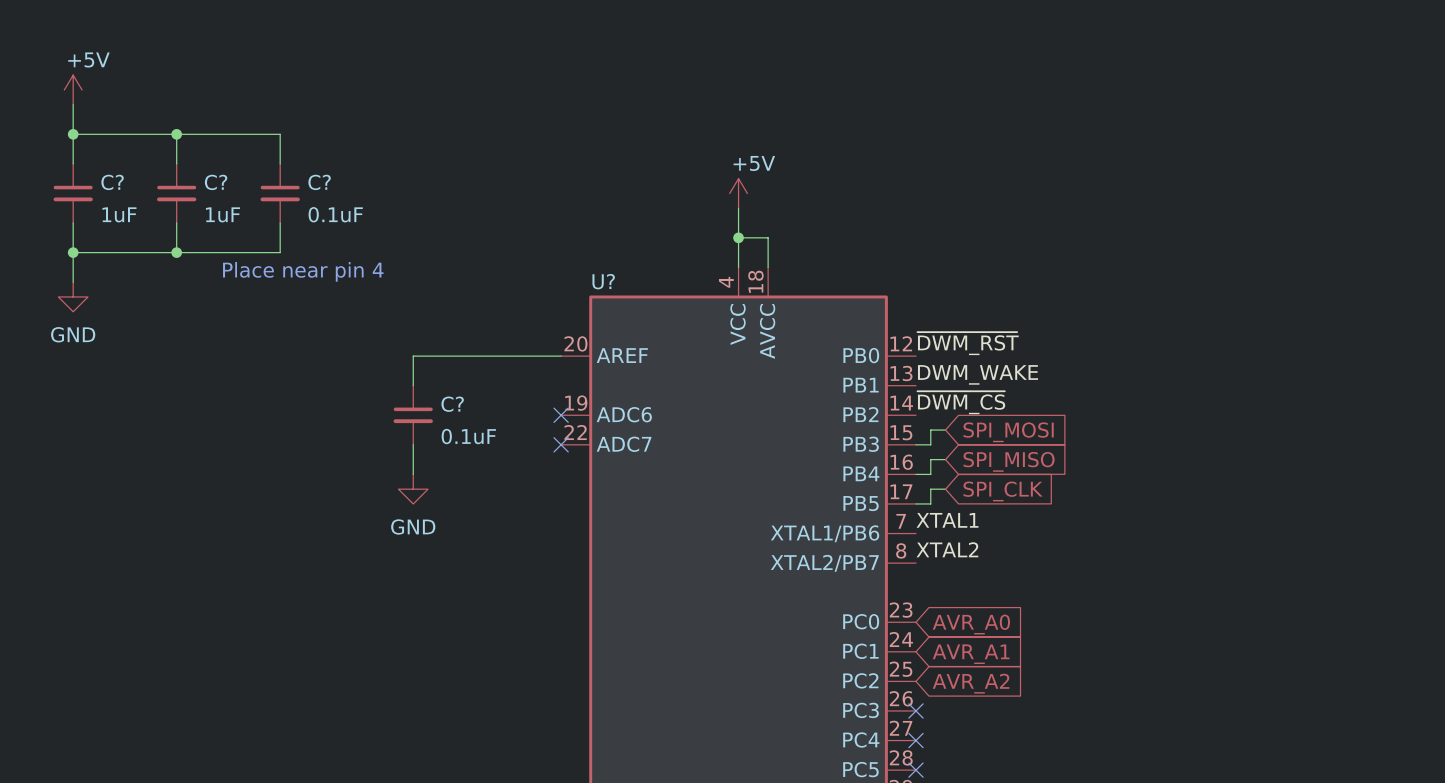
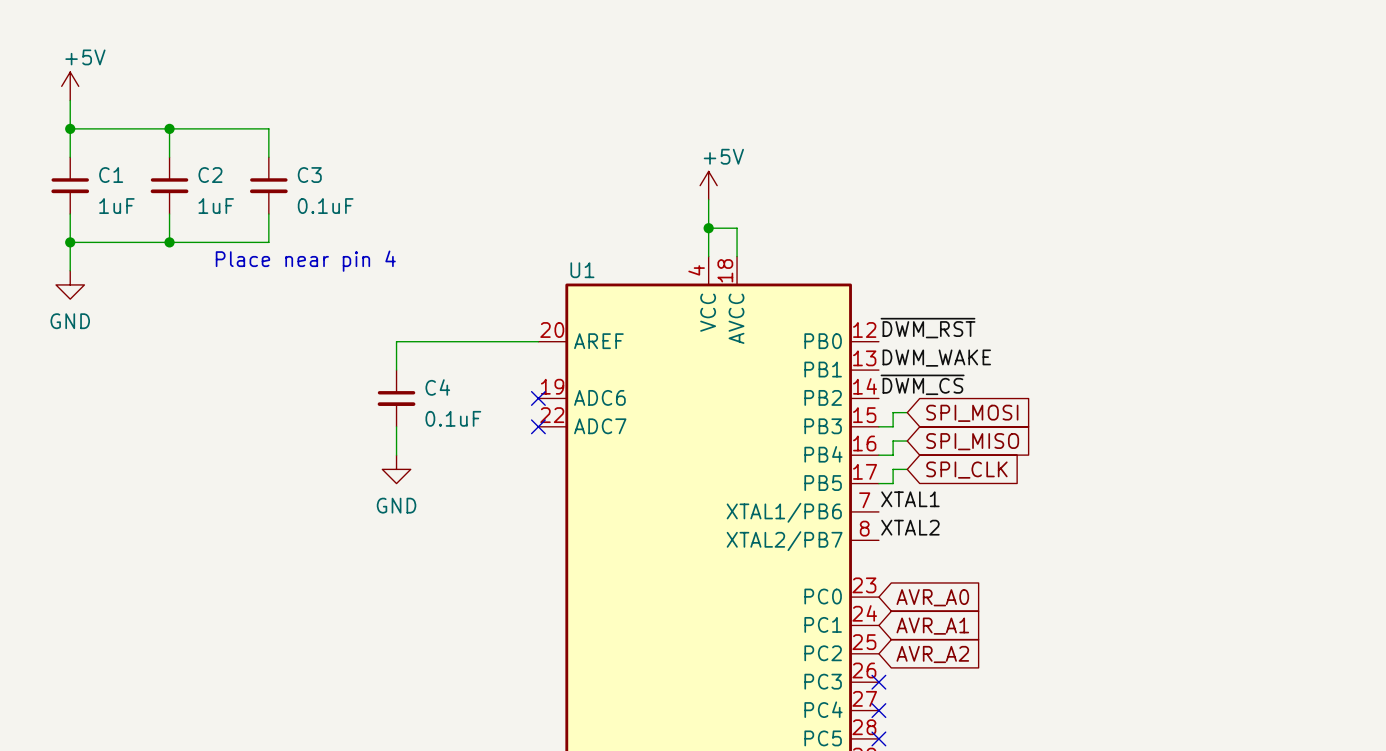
C? name: C? (112, 182) -> C1 (111, 175)
C? name: C? (216, 182) -> C2 (210, 175)
C? name: C? (319, 182) -> C3 (309, 175)
U? name: U? (603, 281) -> U1 (582, 270)
C? name: C? (452, 404) -> C4 (437, 387)

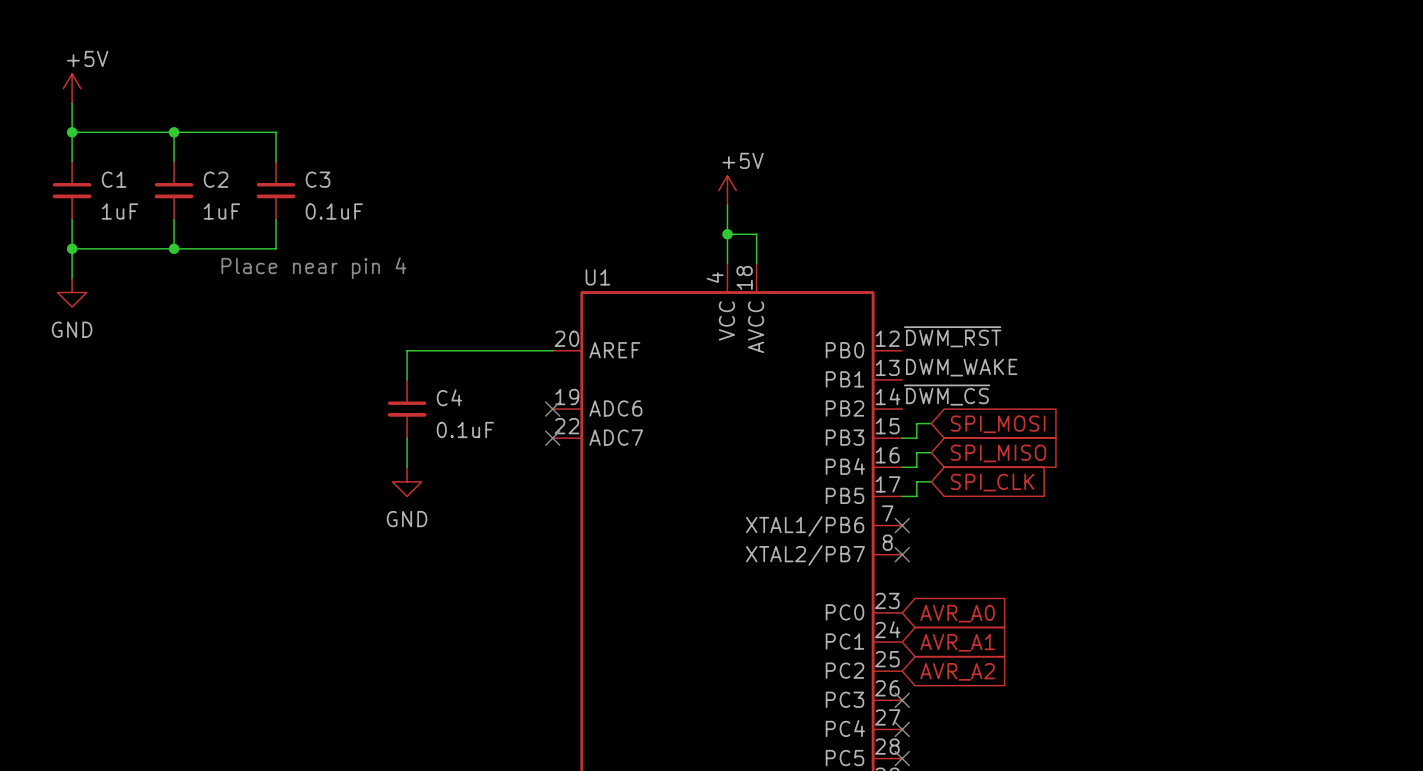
label: XTAL1 (910, 499) -> none
no-connect mark: none -> (902, 525)
label: XTAL2 (910, 527) -> none
no-connect mark: none -> (902, 554)

